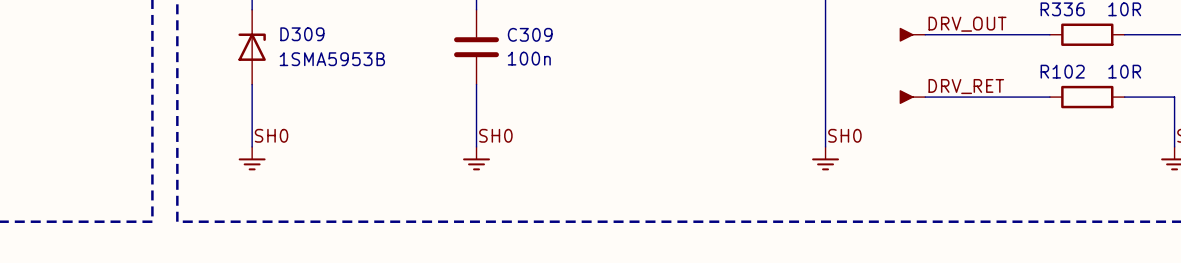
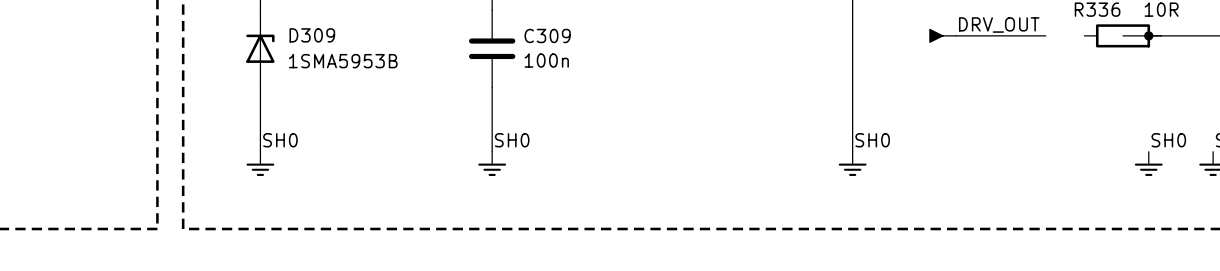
wire: (1012, 34) (1049, 34) -> (1123, 35) (1161, 35)
junction: none -> (1148, 35)
label: DRV_RET (966, 86) -> none
part: (912, 97) -> none
wire: (925, 97) (1049, 97) -> none
R102: 10R (1087, 97) -> none
wire: (1124, 97) (1174, 97) (1174, 146) -> none
label: none -> SH0 (1168, 140)
part: none -> (1148, 163)

